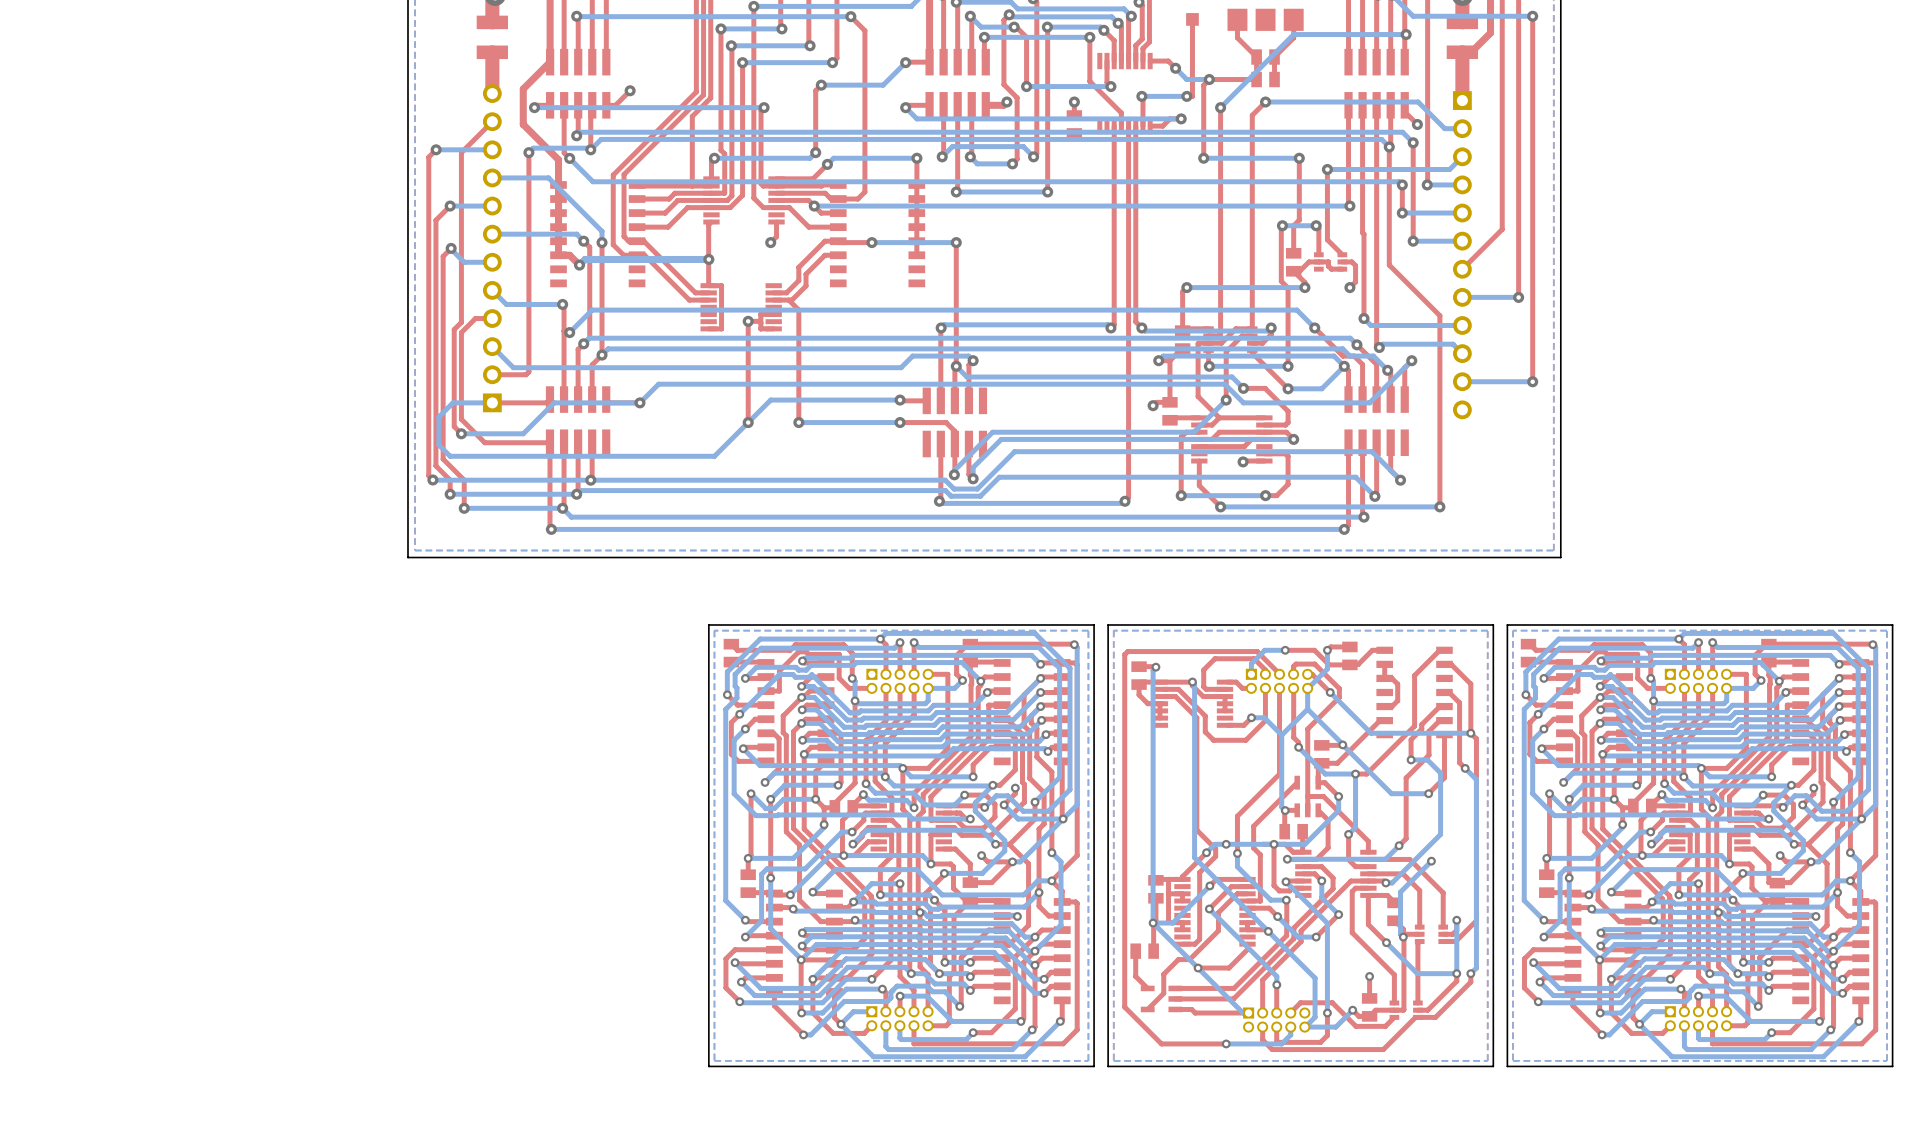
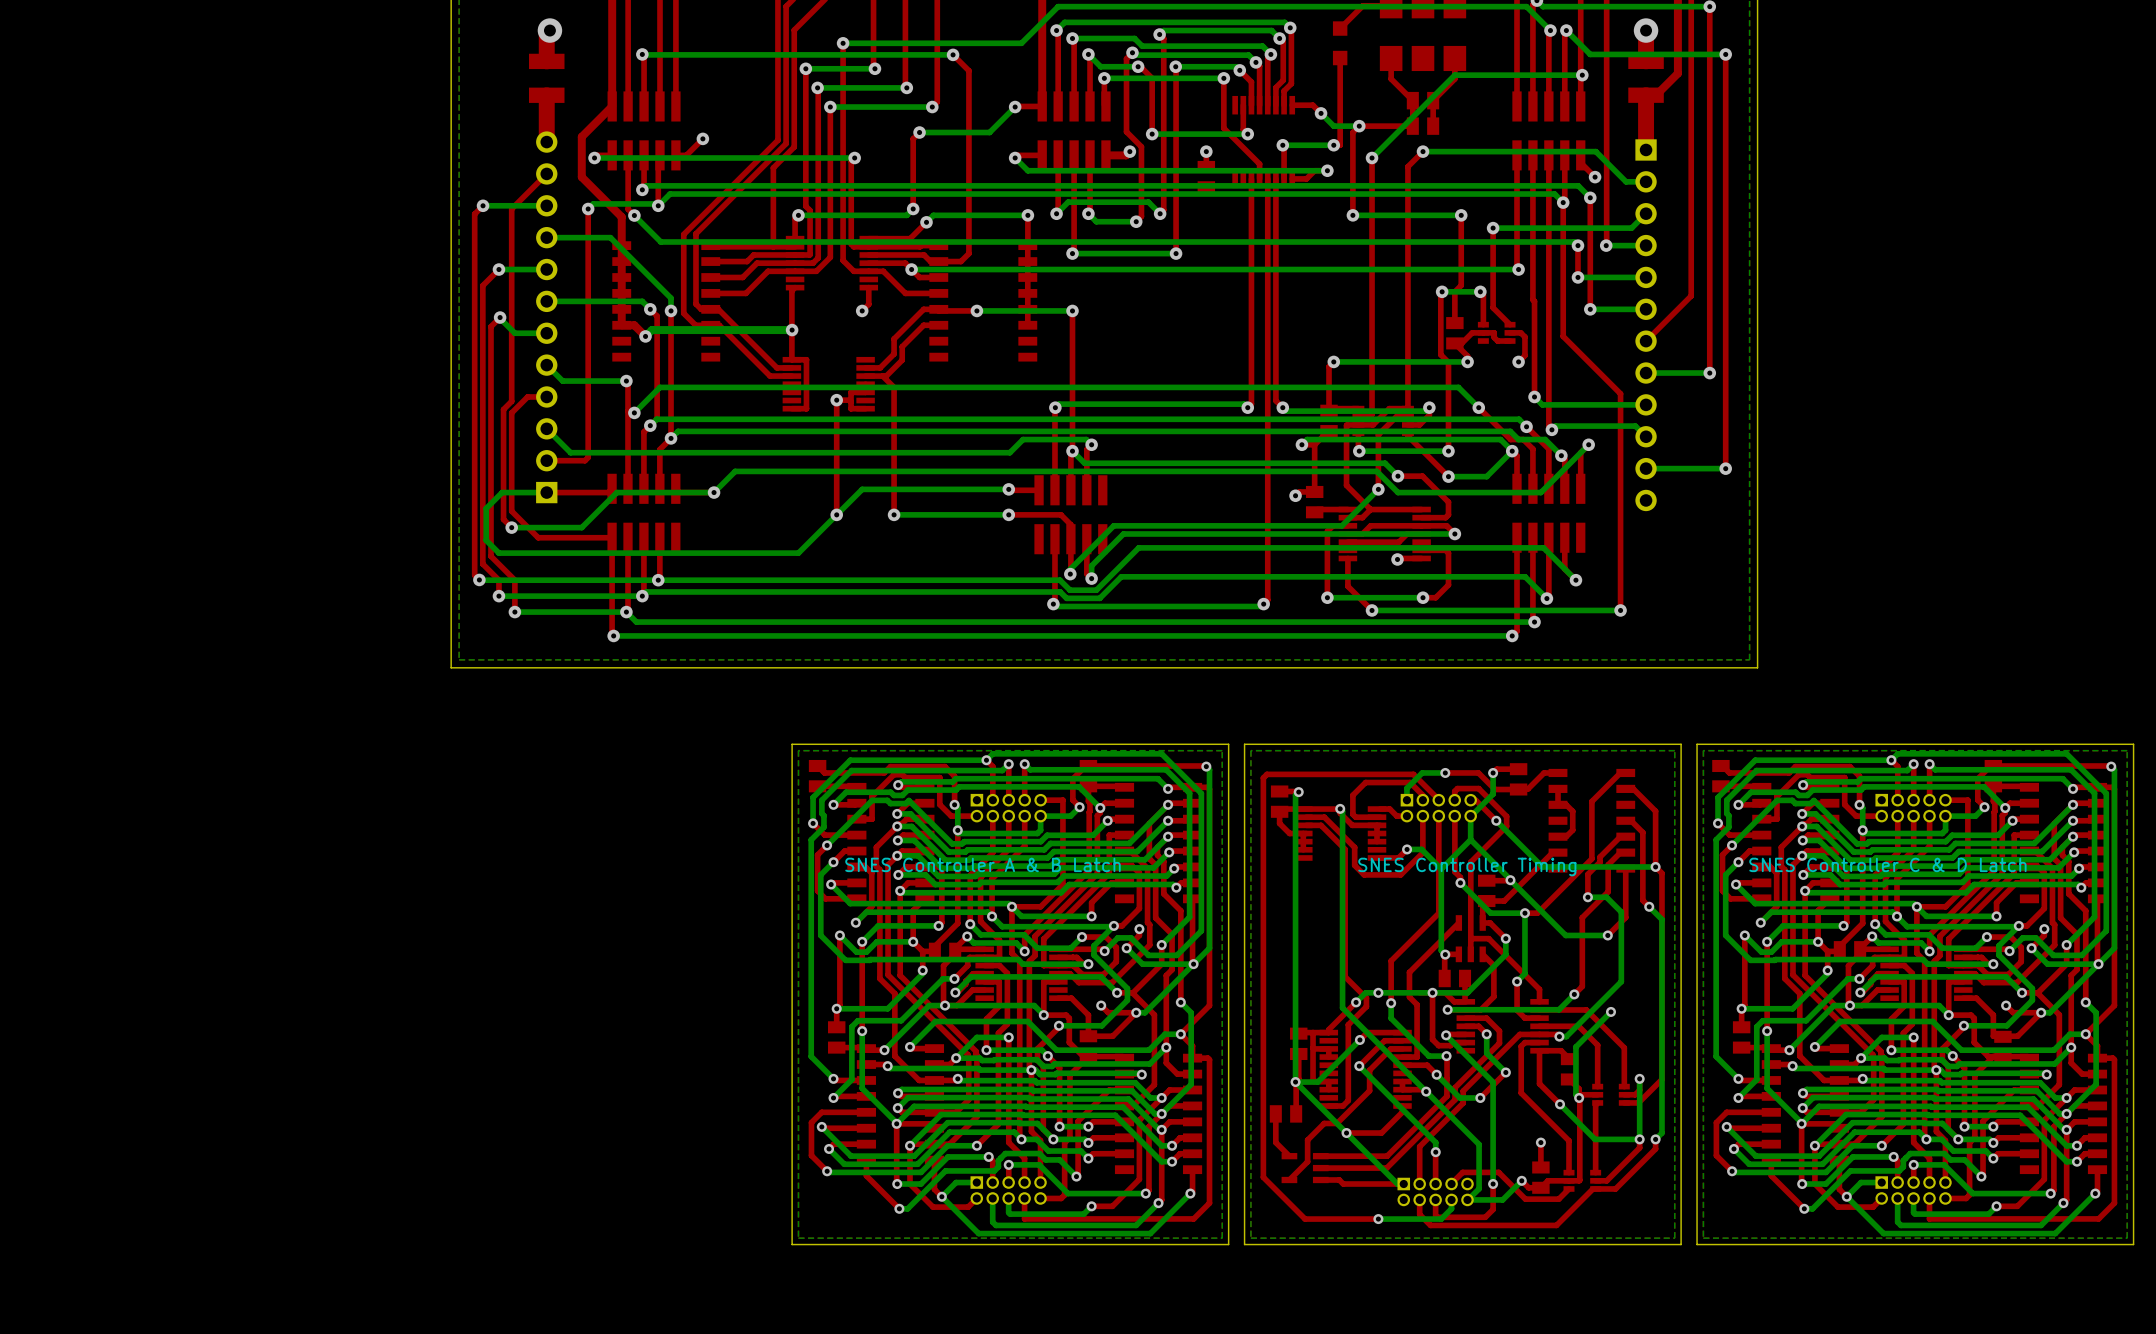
text: none -> SNES Controller A & B Latch (982, 864)
text: none -> SNES Controller C & D Latch (1887, 864)
text: none -> SNES Controller Timing (1467, 866)

